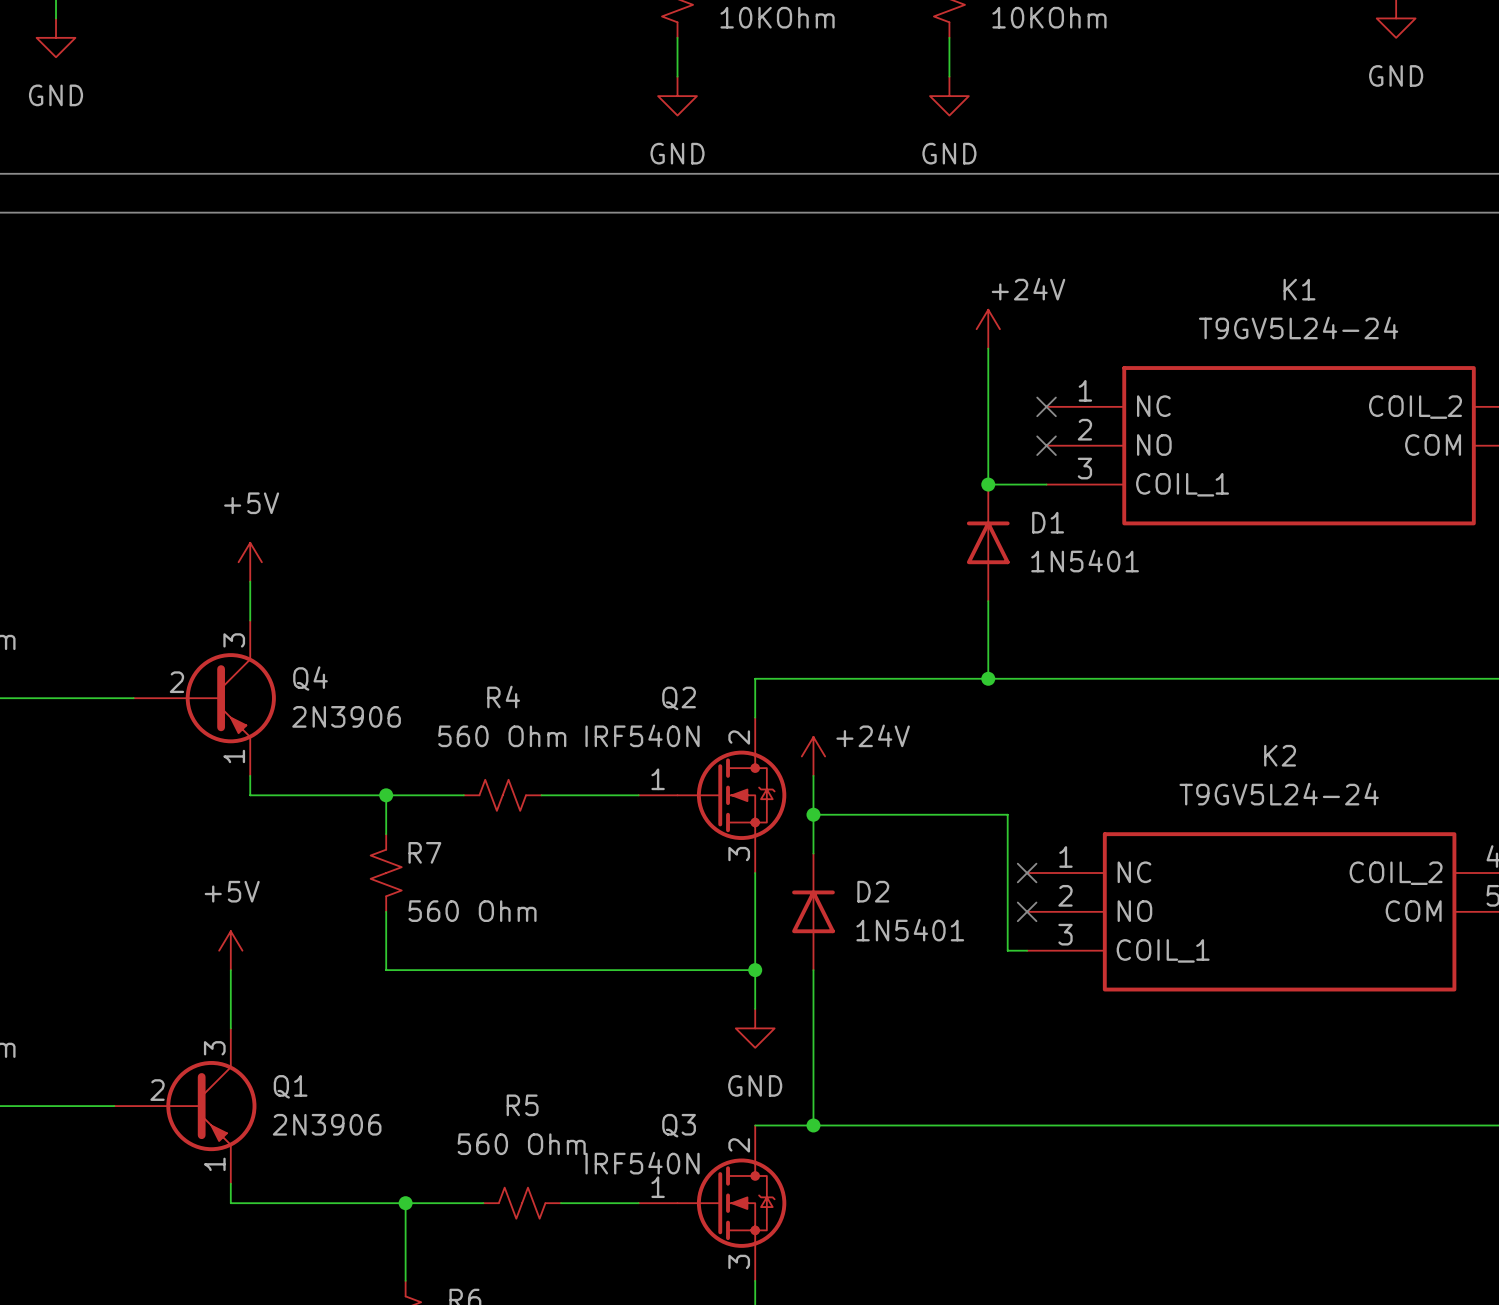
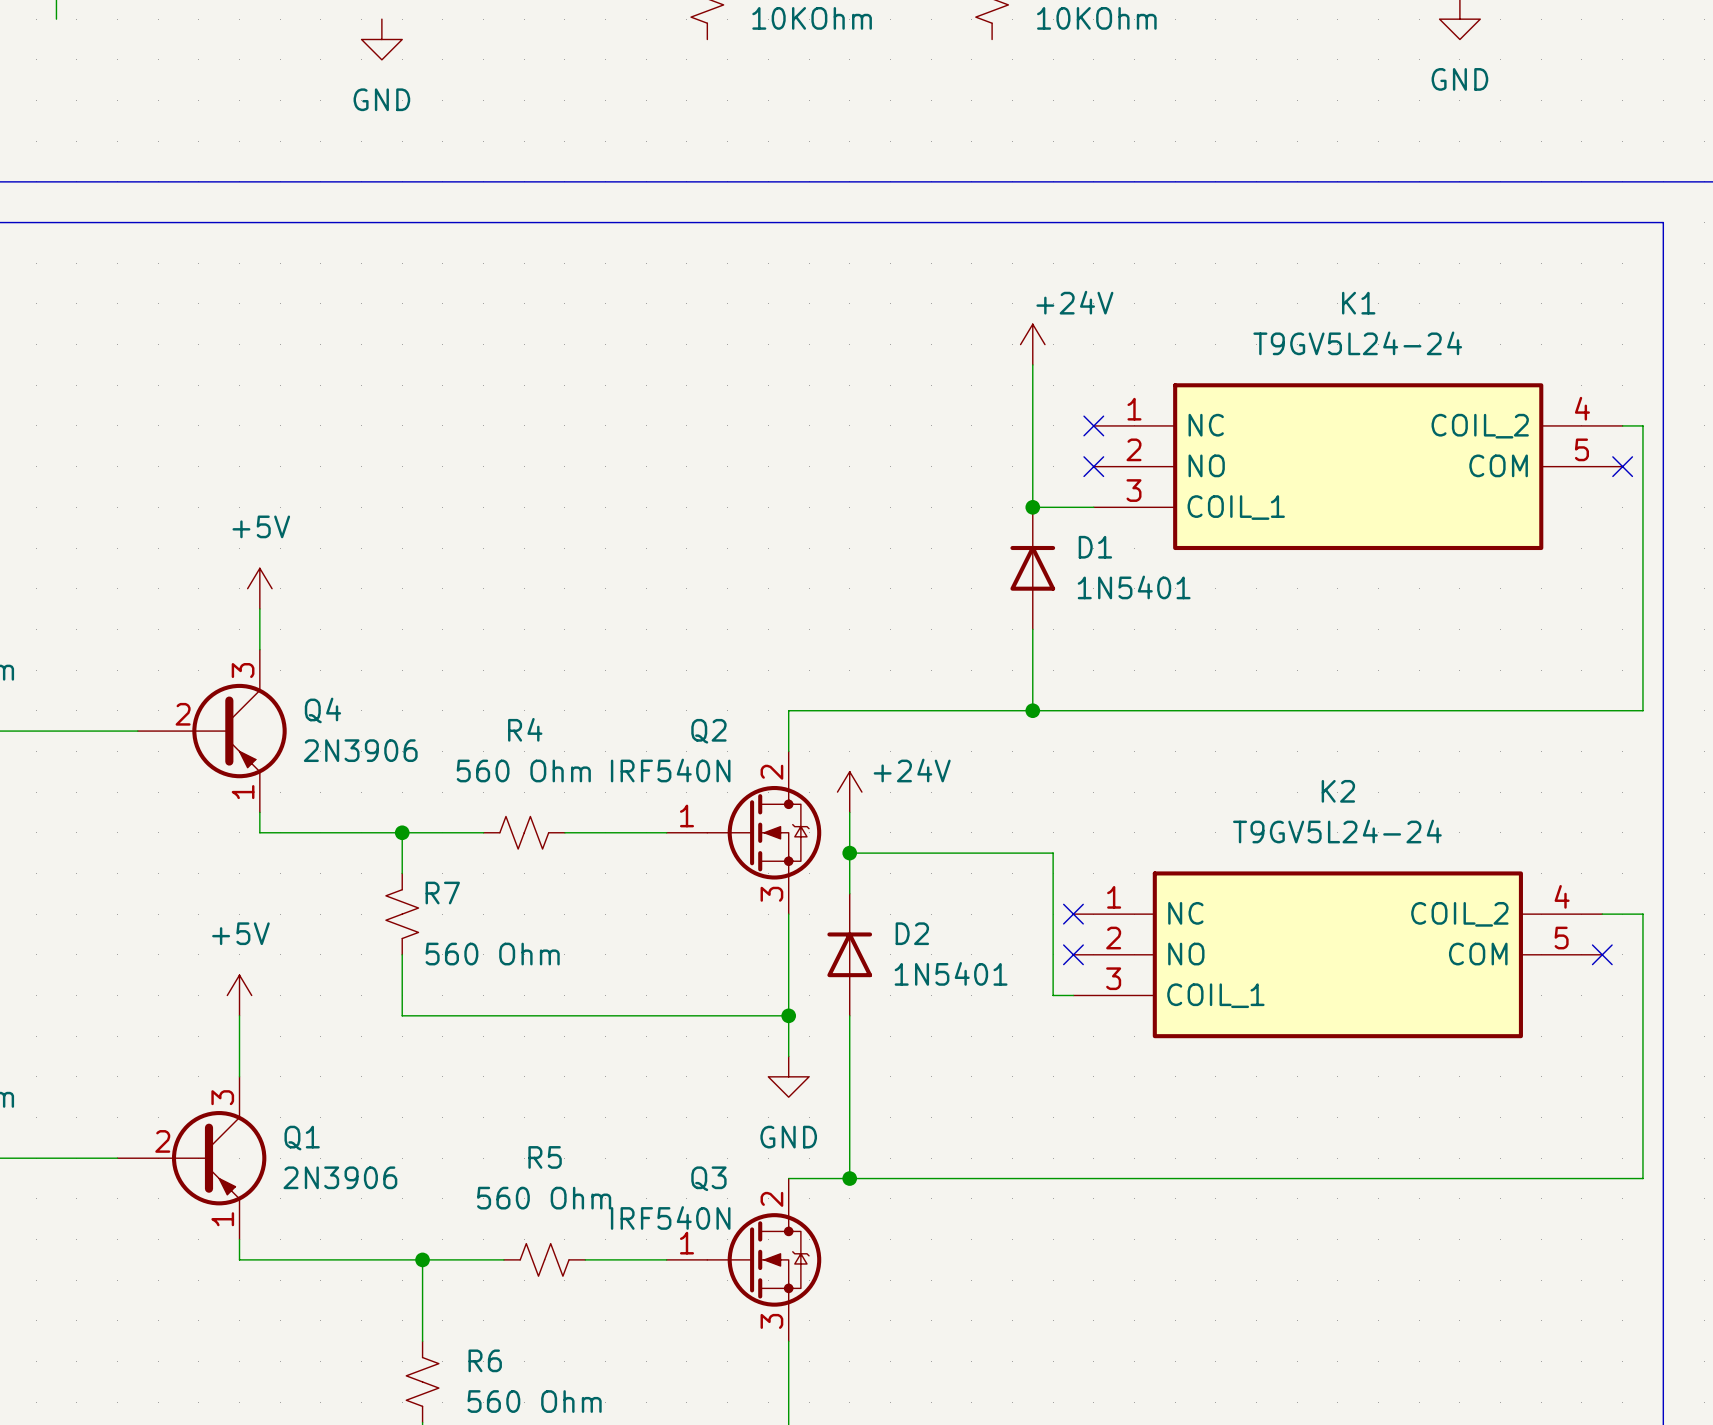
power symbol: GND (56, 37) -> none
power symbol: none -> GND (381, 39)
wire: (677, 37) (677, 76) -> none
wire: (949, 37) (949, 76) -> none
power symbol: GND (677, 96) -> none
power symbol: GND (949, 96) -> none

